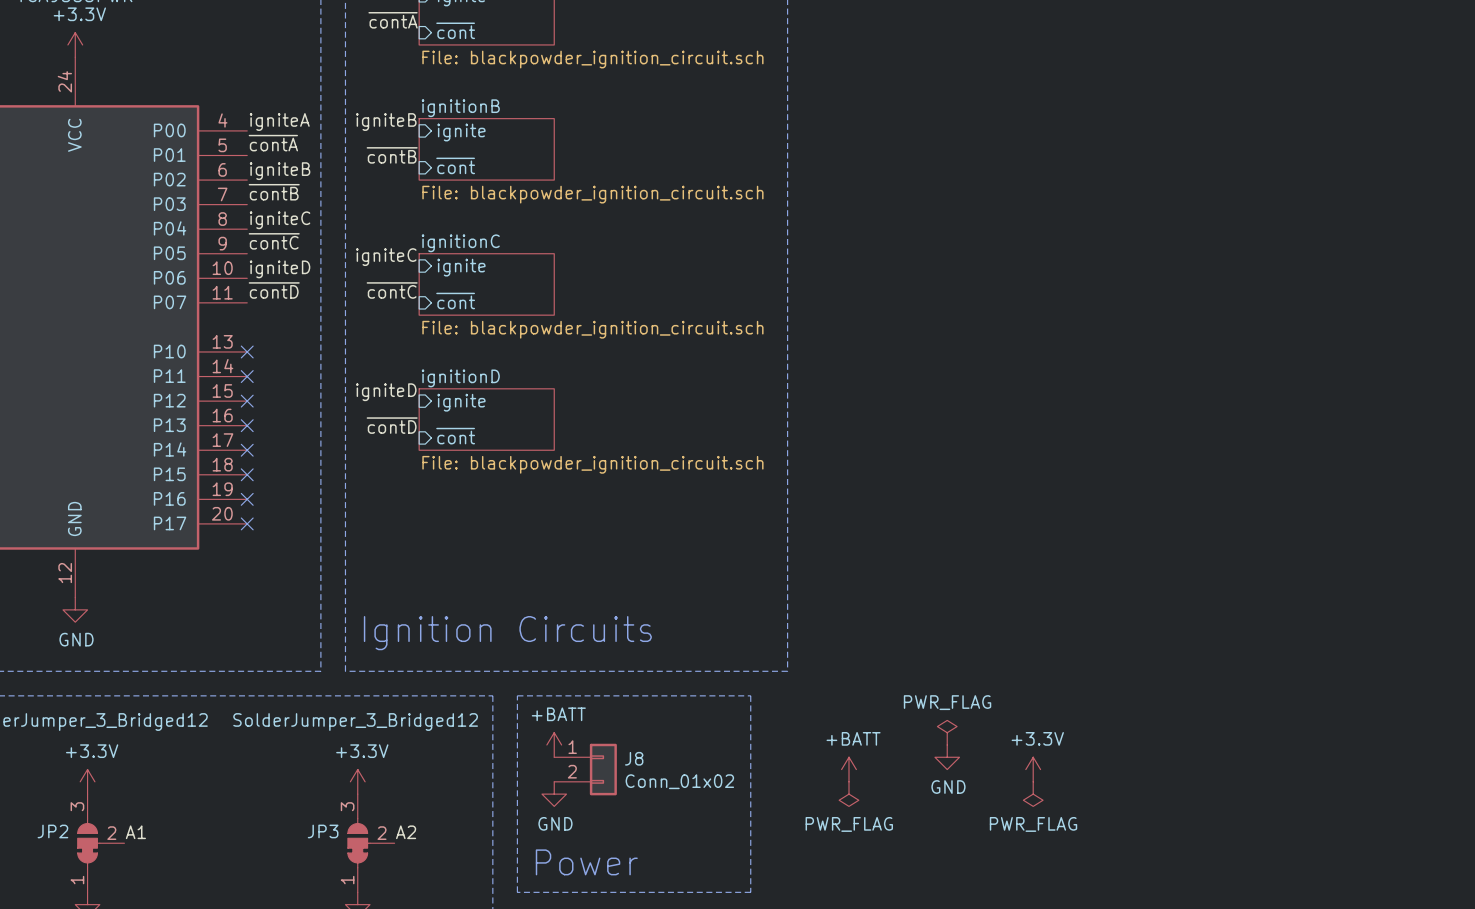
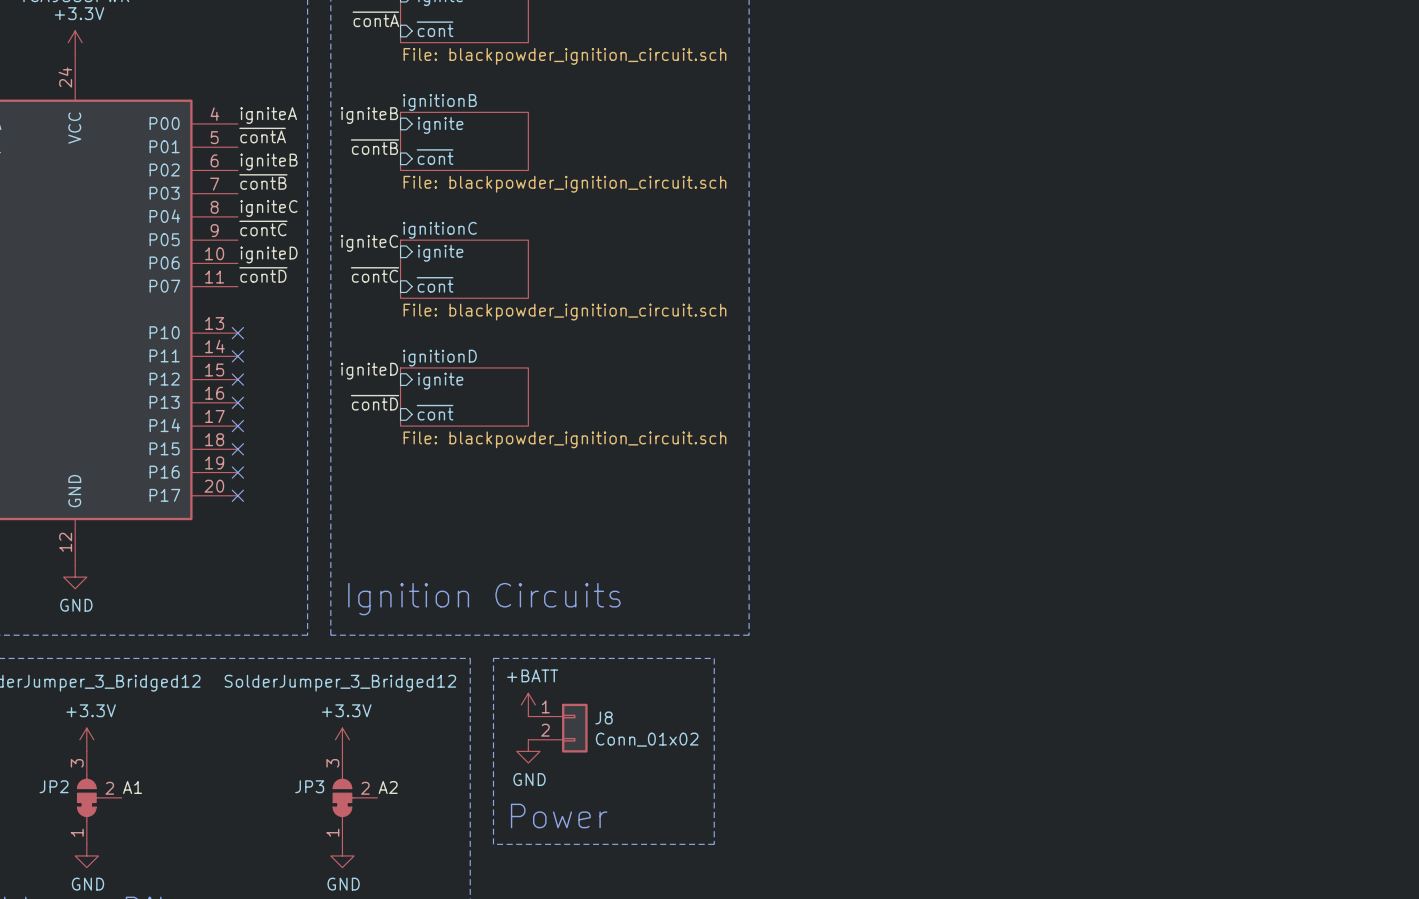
power symbol: PWR_FLAG (947, 732) -> none
power symbol: GND (947, 757) -> none
power symbol: +BATT (848, 769) -> none
power symbol: +3.3V (1033, 769) -> none
power symbol: PWR_FLAG (848, 794) -> none
power symbol: PWR_FLAG (1033, 794) -> none

